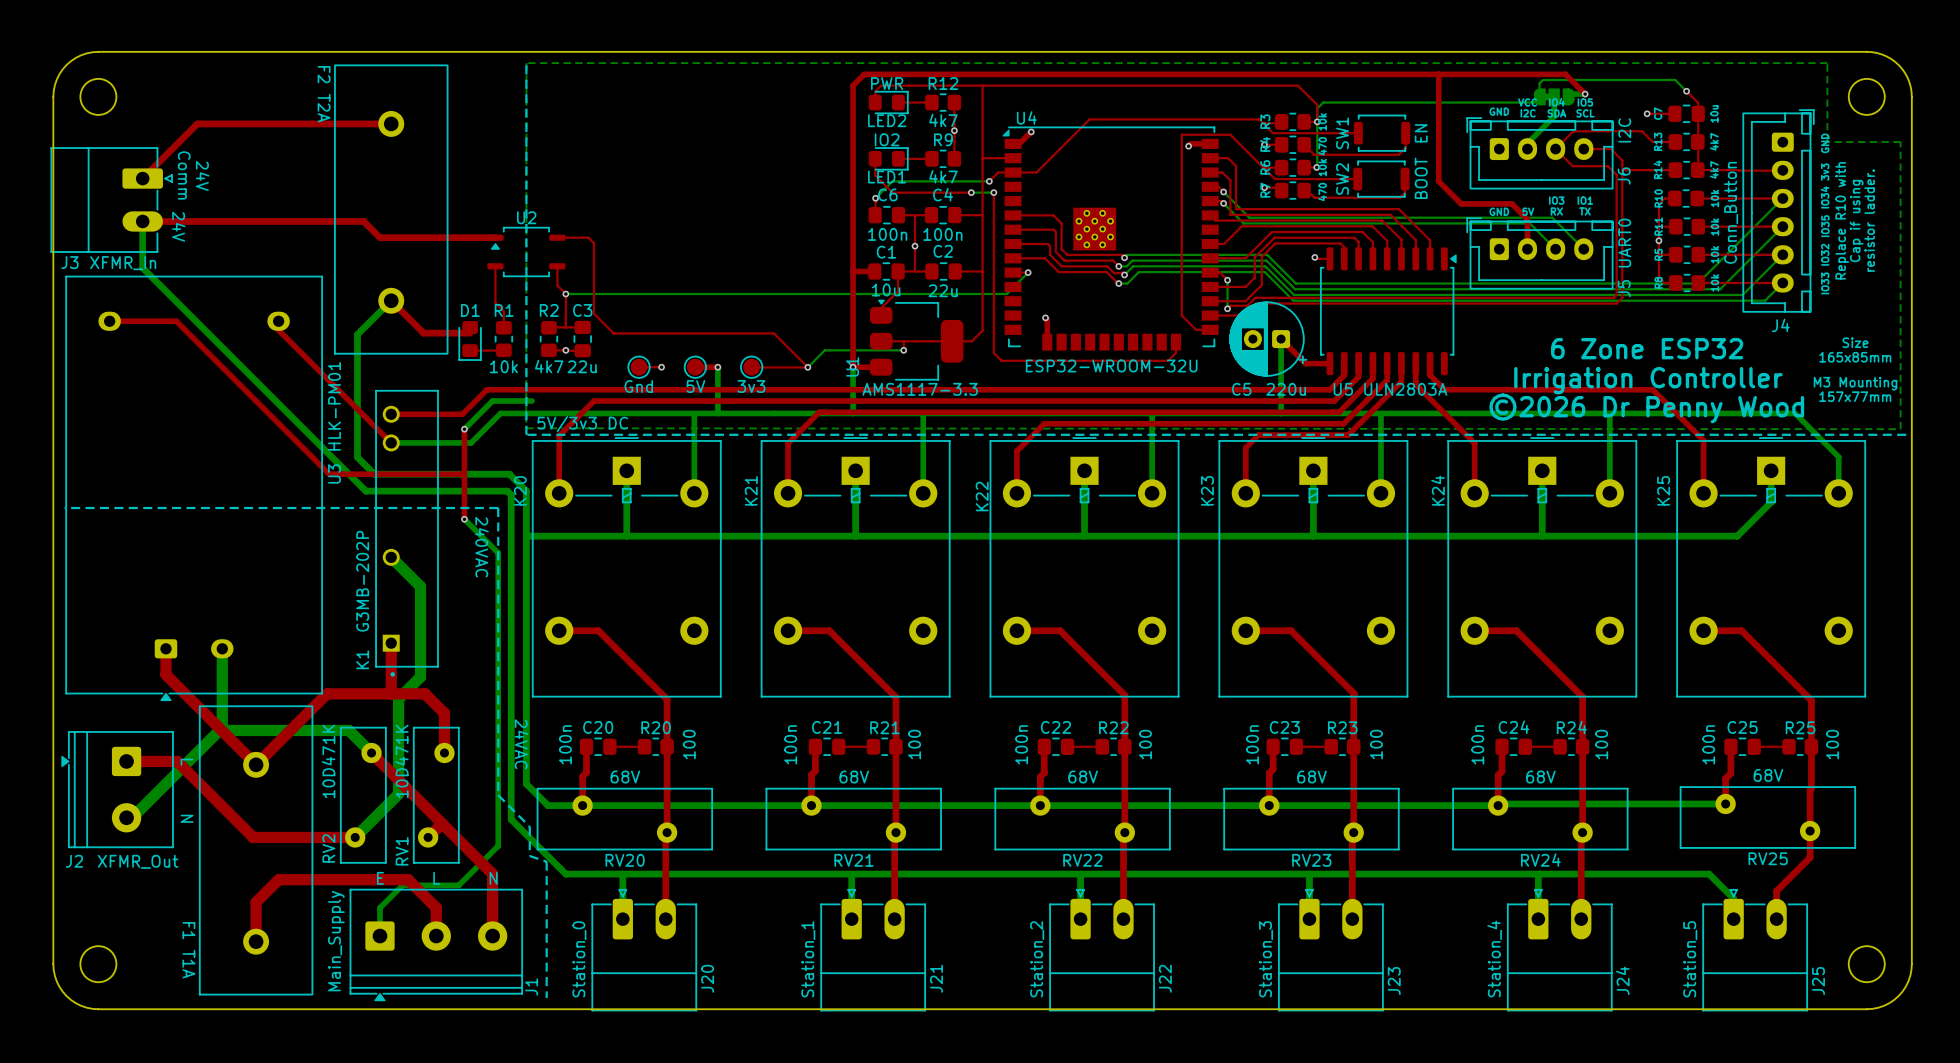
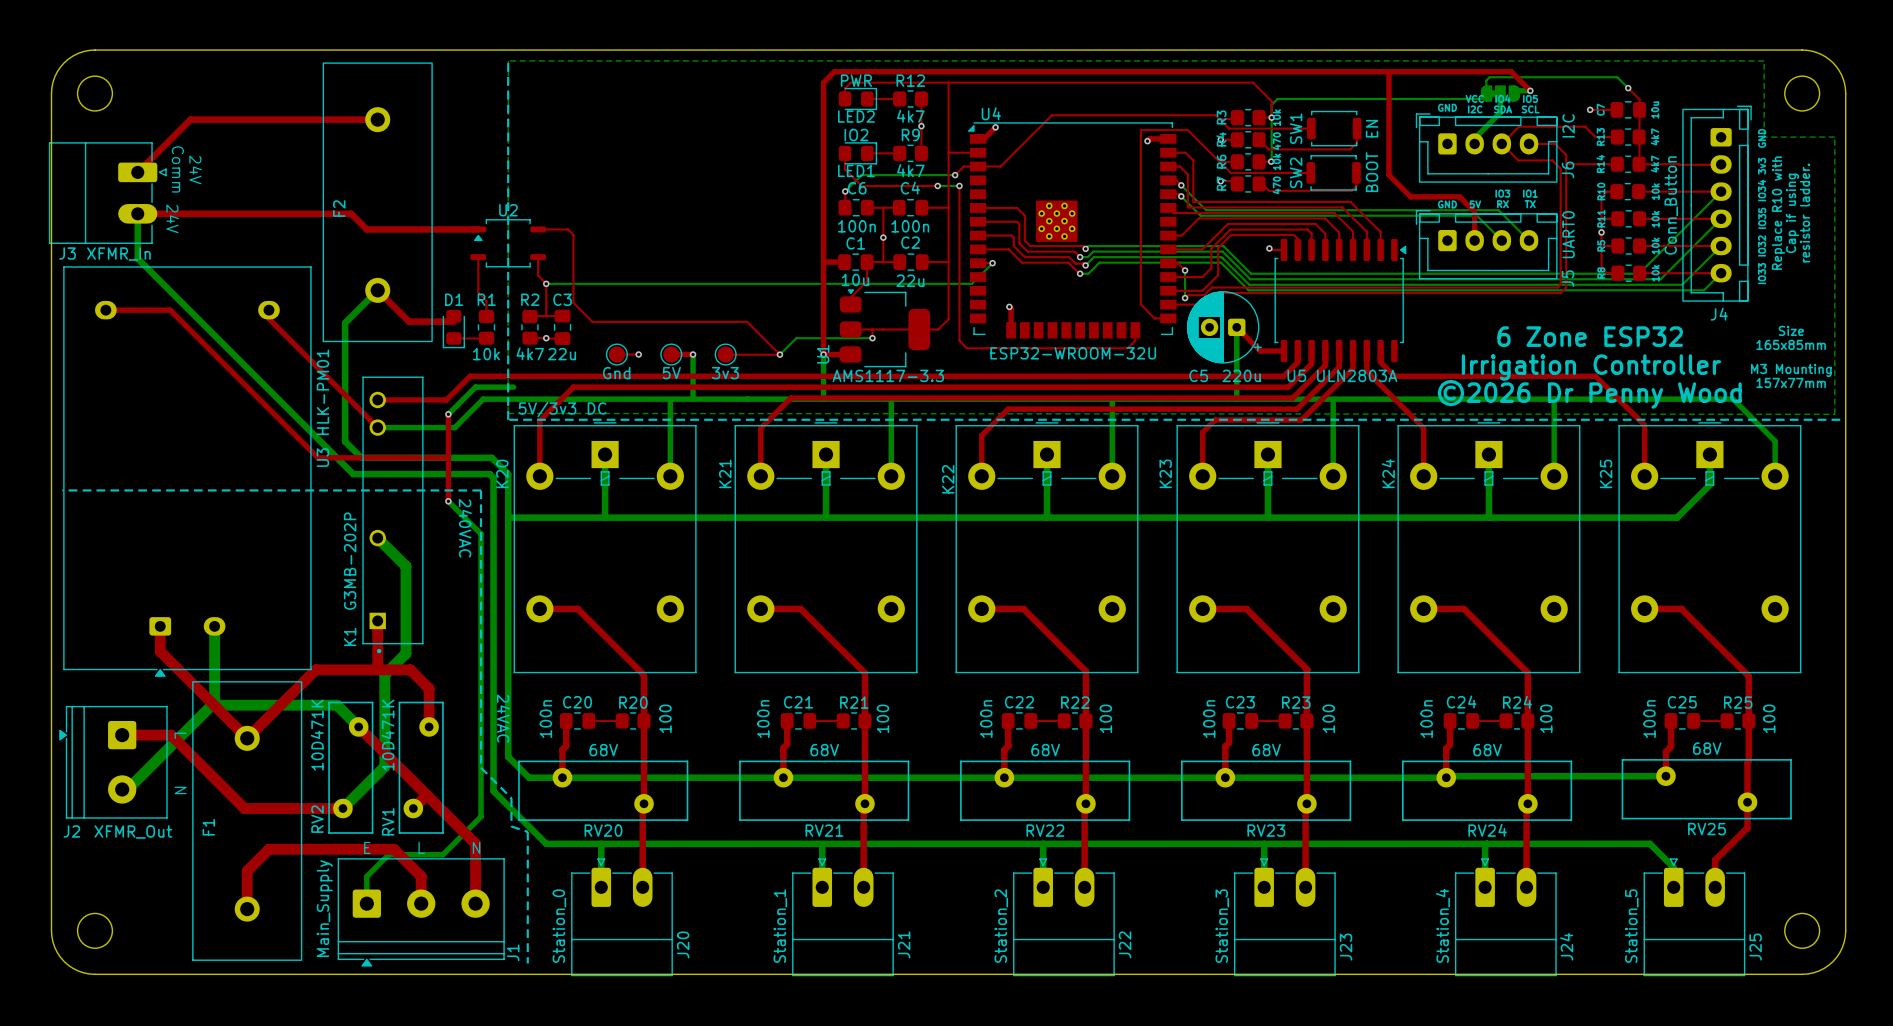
F2 name rotation: 0° (324, 74) -> 180° (339, 208)
F2 name position: F2 (324, 74) -> F2 (339, 208)
F2 value: T2A (324, 108) -> none
F1 name rotation: 0° (188, 930) -> 180° (208, 827)
F1 name position: F1 (188, 930) -> F1 (208, 827)
F1 value: T1A (188, 964) -> none

